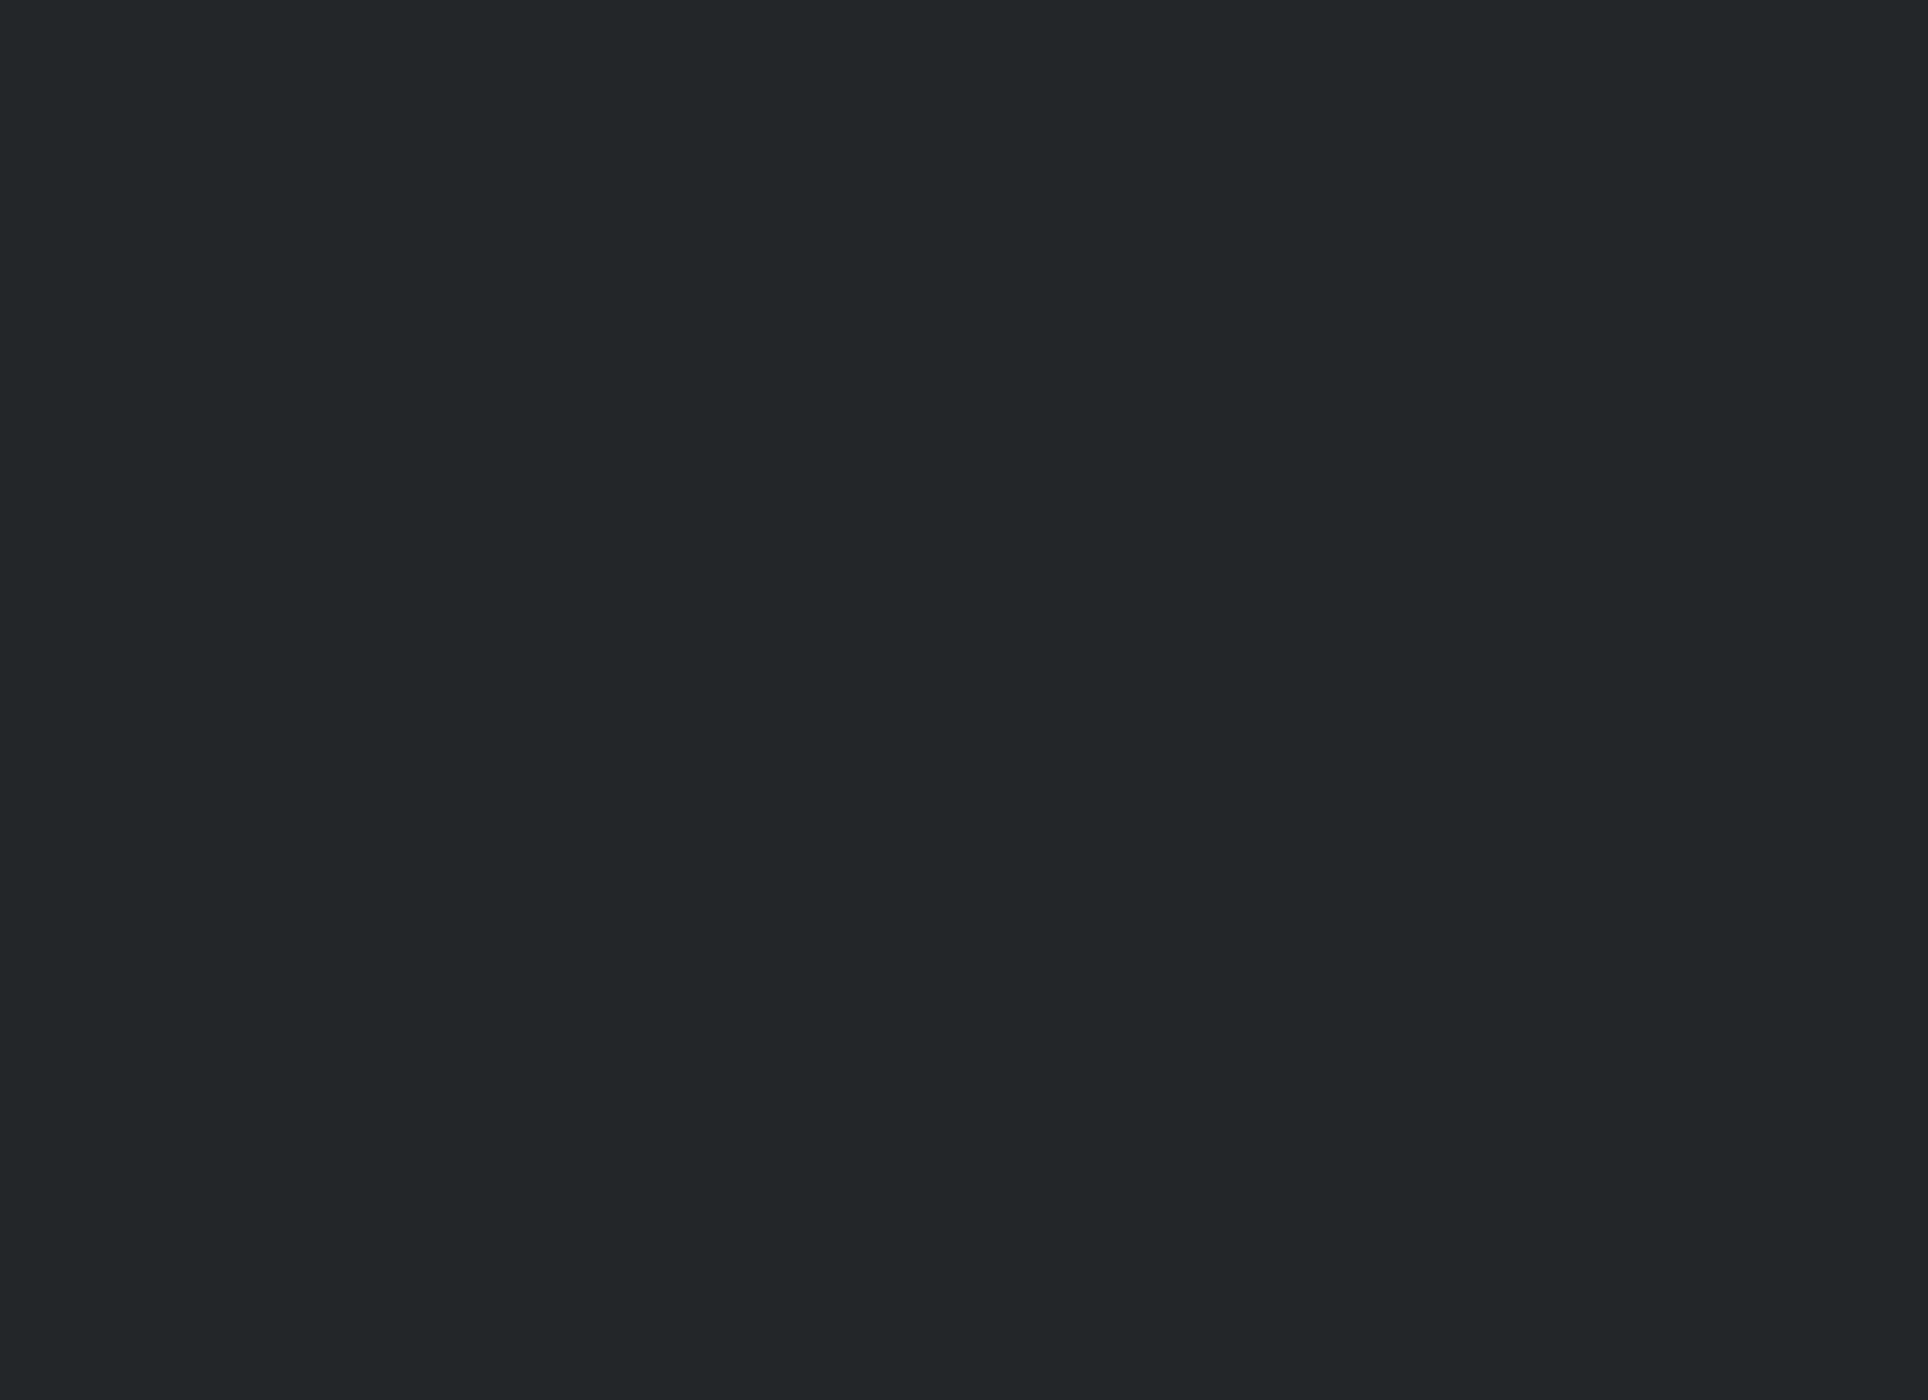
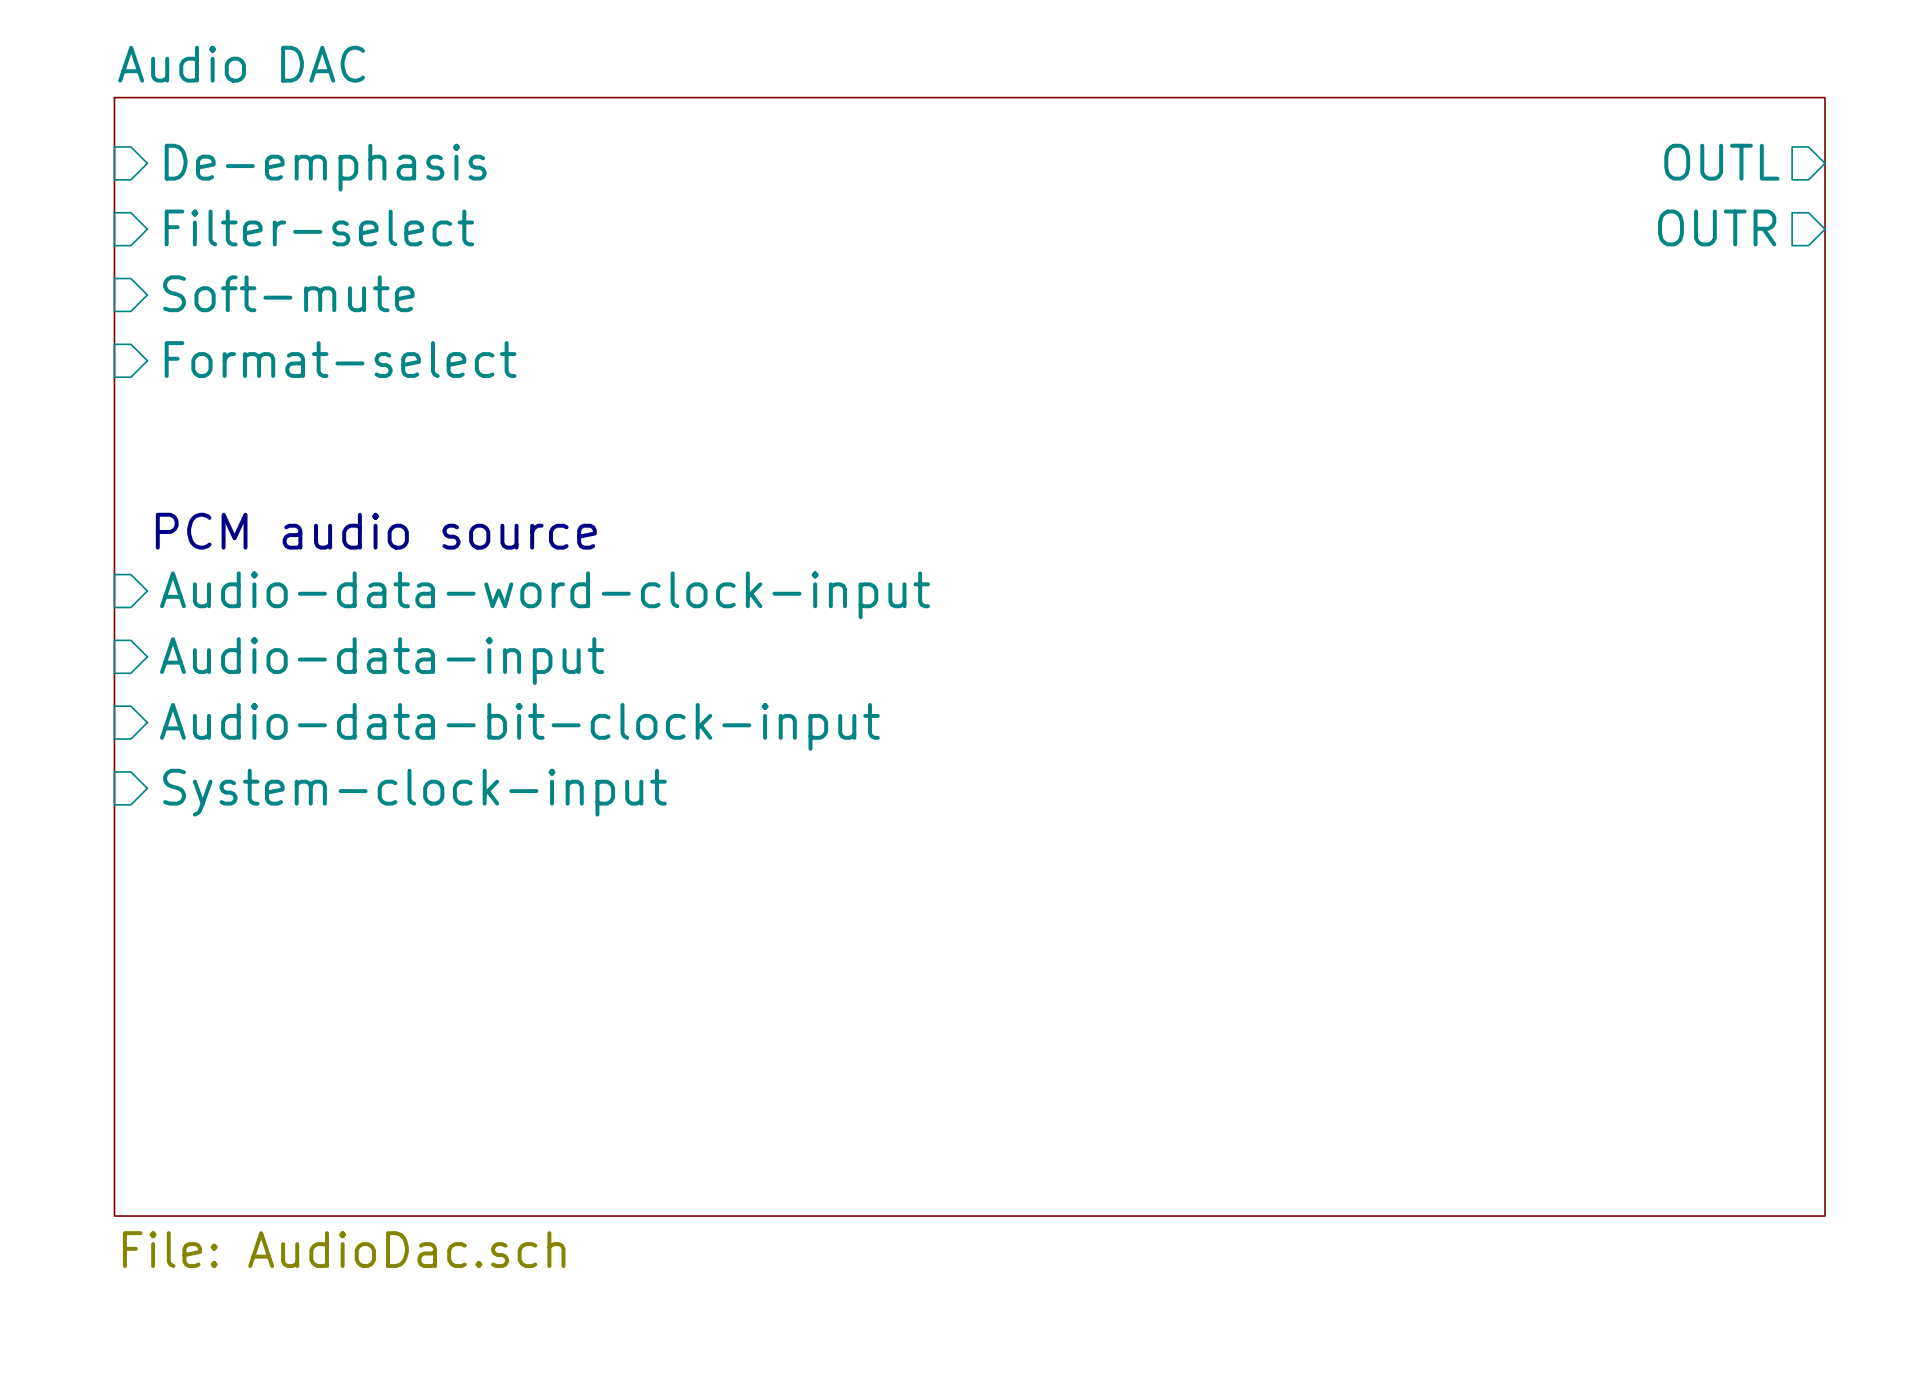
sheet pin: none -> OUTL (1721, 162)
sheet pin: none -> De-emphasis (325, 167)
sheet pin: none -> Filter-select (319, 227)
sheet pin: none -> OUTR (1717, 227)
sheet pin: none -> Soft-mute (288, 293)
sheet pin: none -> Format-select (340, 359)
text: none -> PCM audio source (376, 531)
sheet pin: none -> Audio-data-word-clock-input (544, 595)
sheet Audio DAC: none -> File: AudioDac.sch (969, 656)
sheet pin: none -> Audio-data-input (382, 661)
sheet pin: none -> Audio-data-bit-clock-input (519, 726)
sheet pin: none -> System-clock-input (414, 792)

